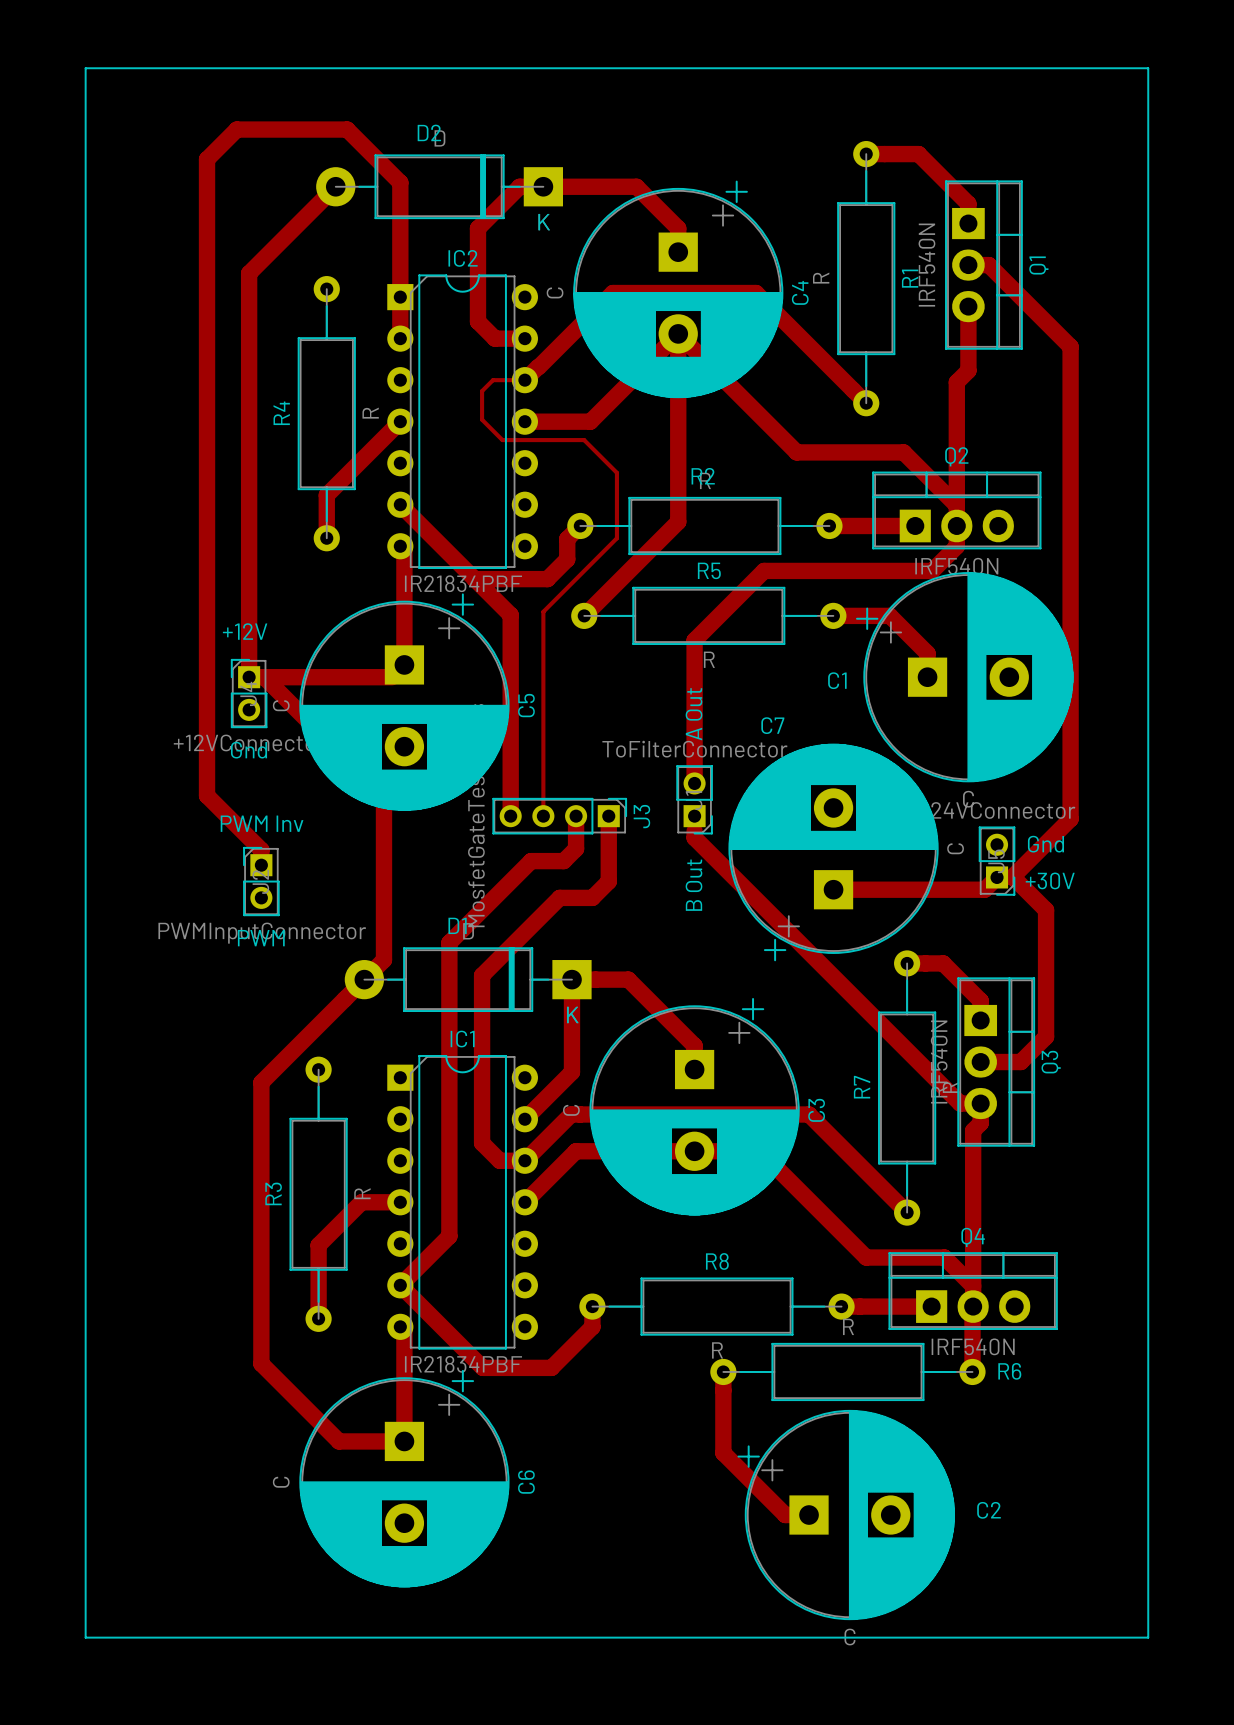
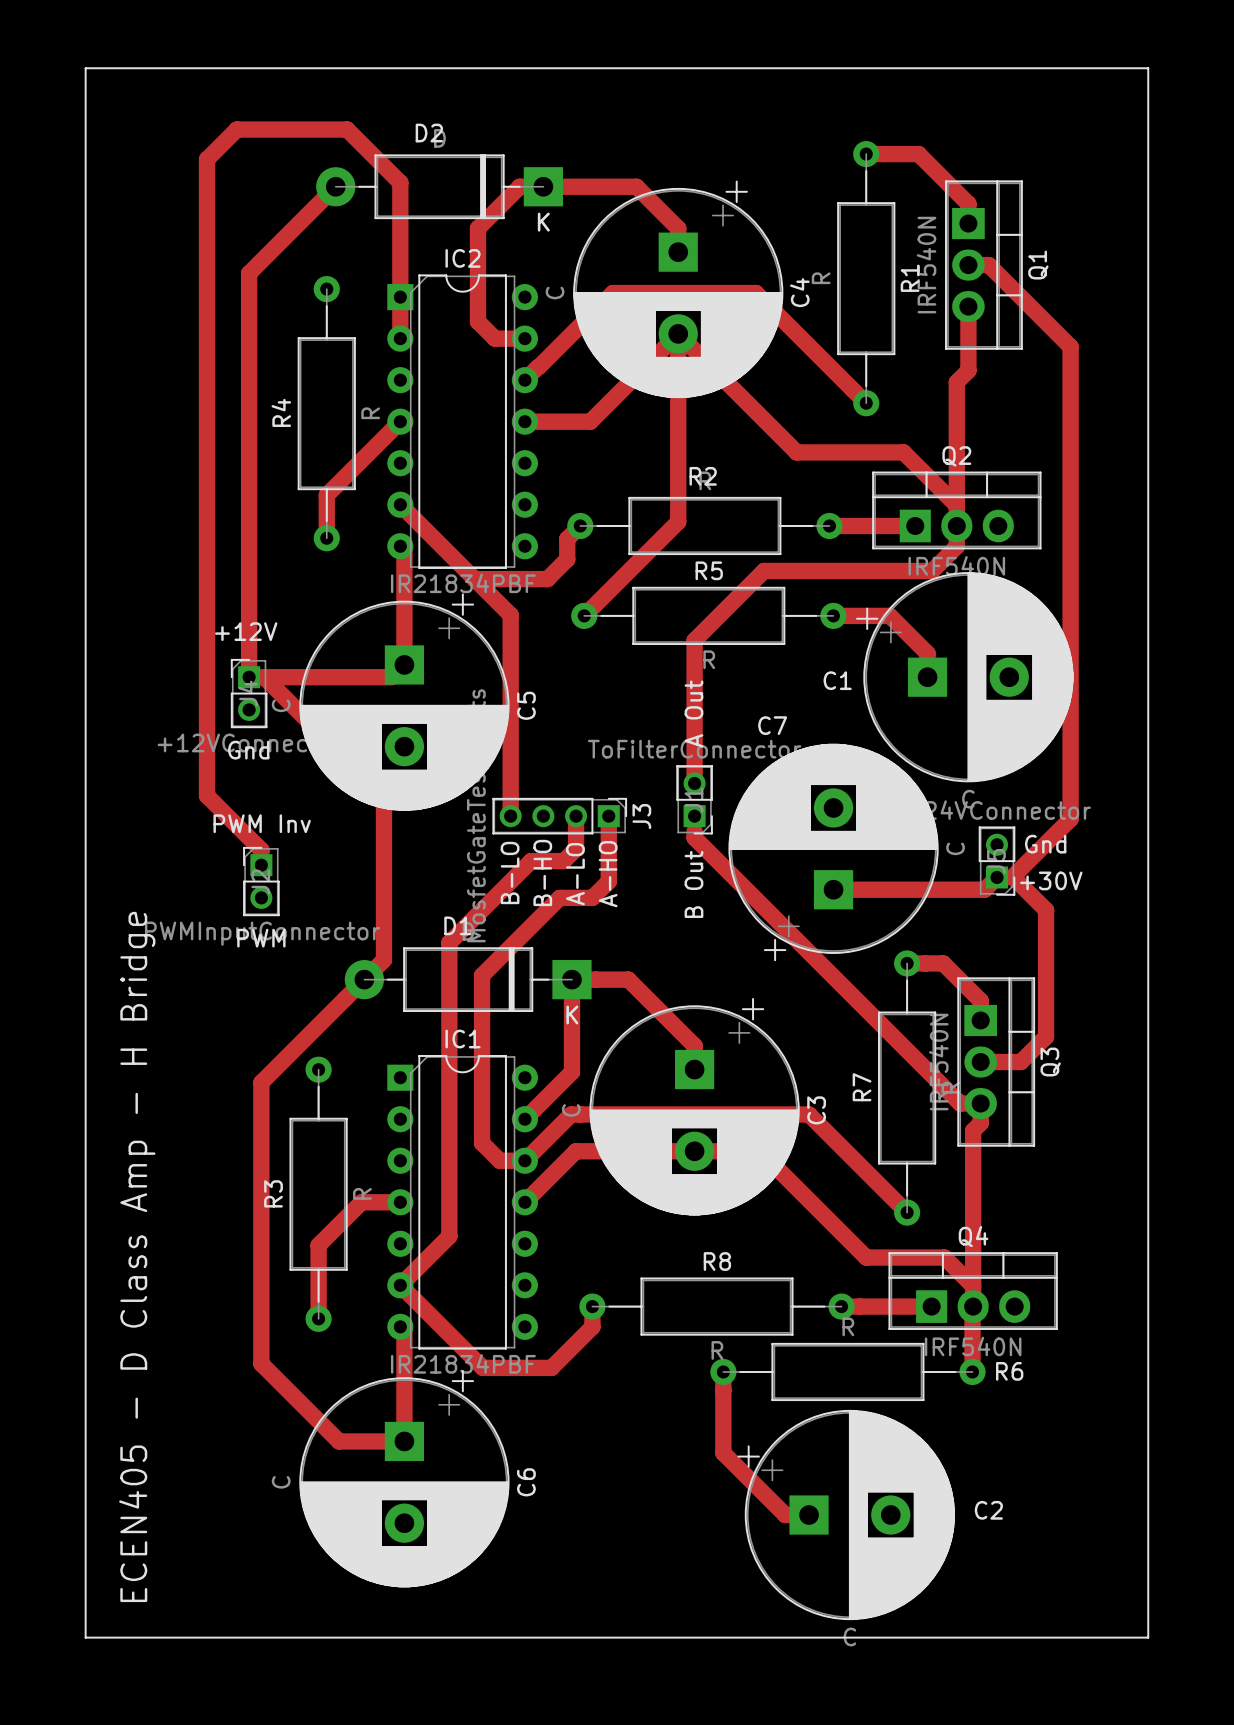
track: (524, 380) (493, 380) (482, 391) (482, 419) (502, 440) (584, 440) (616, 472) (616, 538) (543, 611) (543, 816) -> none
text: none -> B-LO (510, 872)
text: none -> B-HO (542, 872)
text: none -> A-LO (575, 874)
text: none -> A-HO (608, 874)
text: none -> ECEN405 - D Class Amp - H Bridge (137, 1256)

